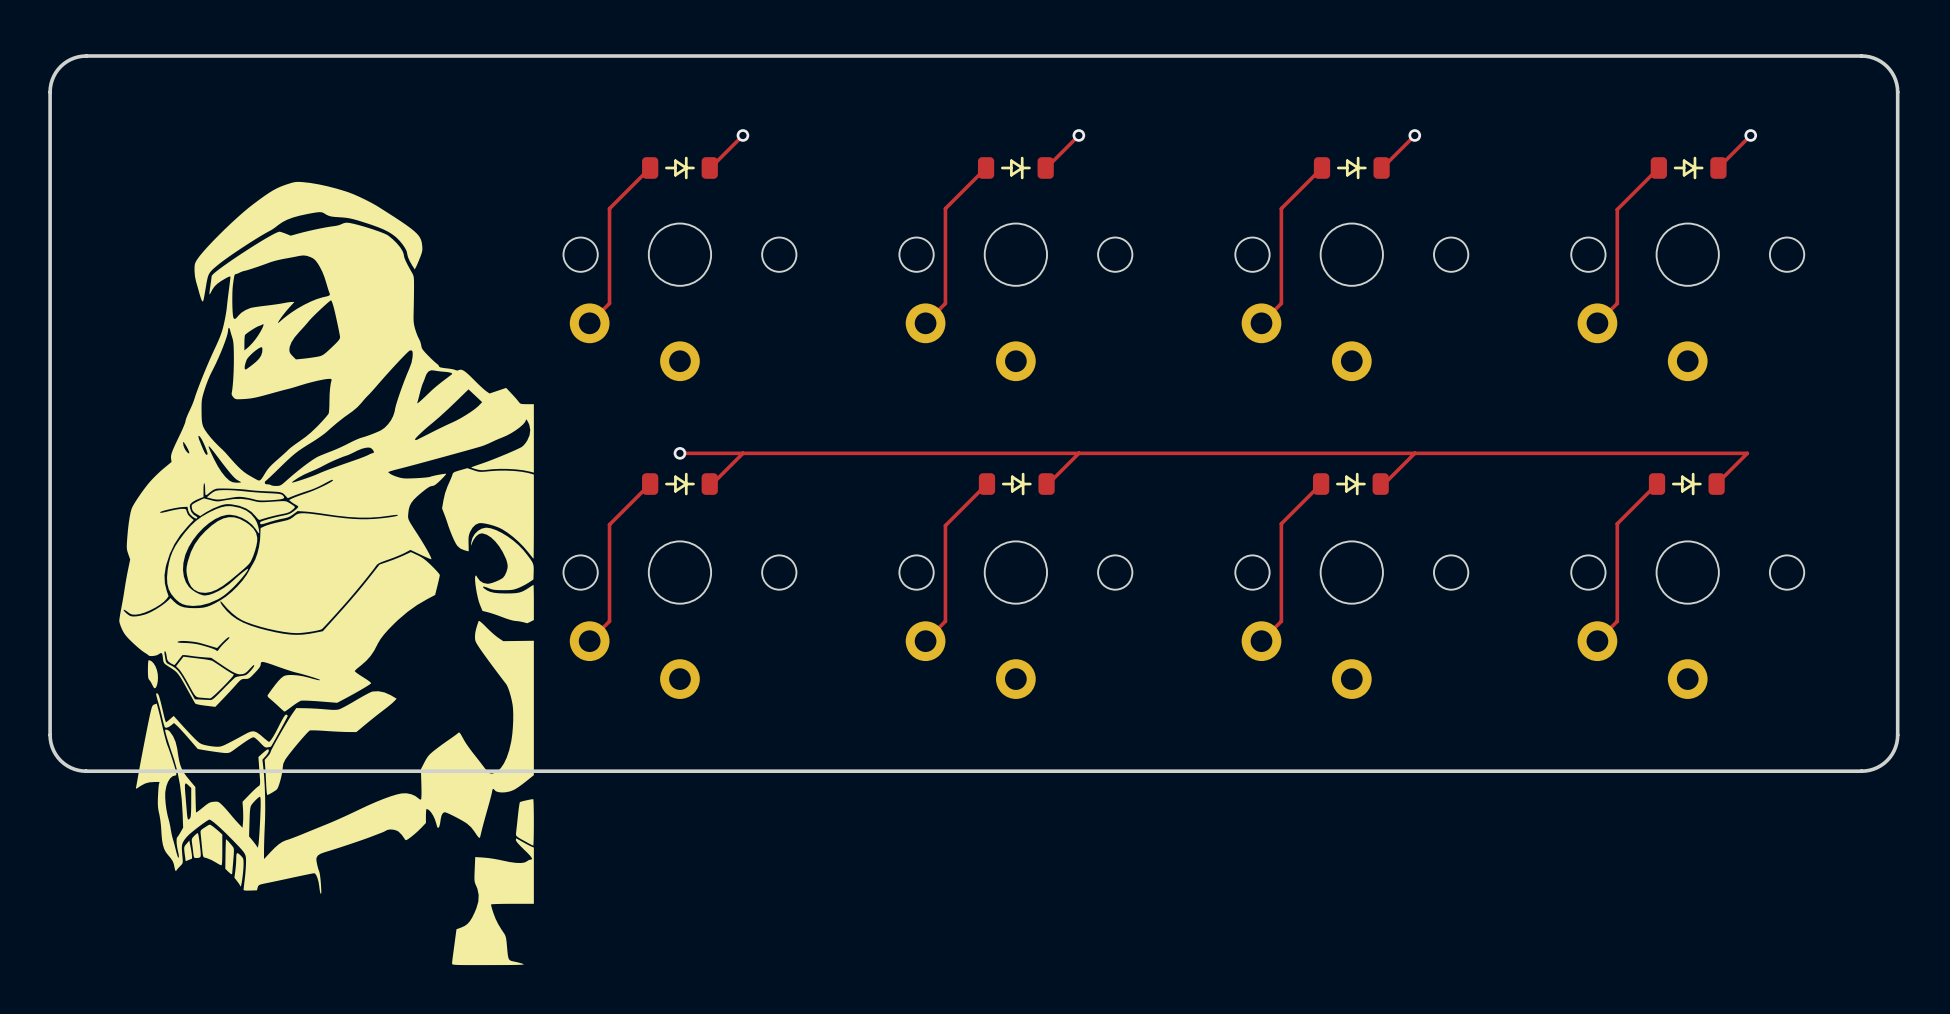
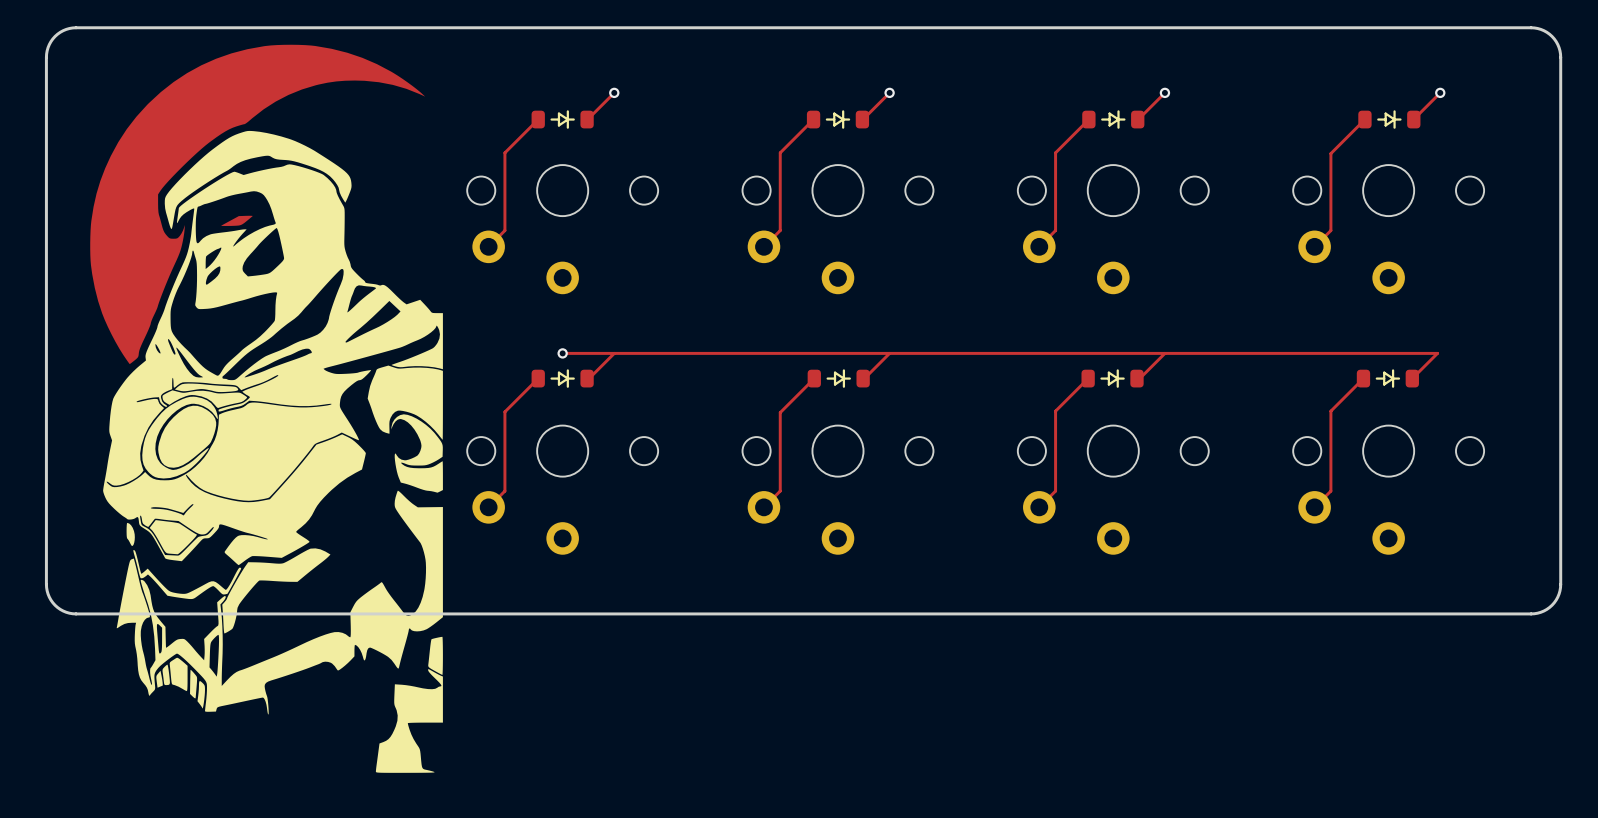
drawing: none -> [90, 44, 426, 365]

